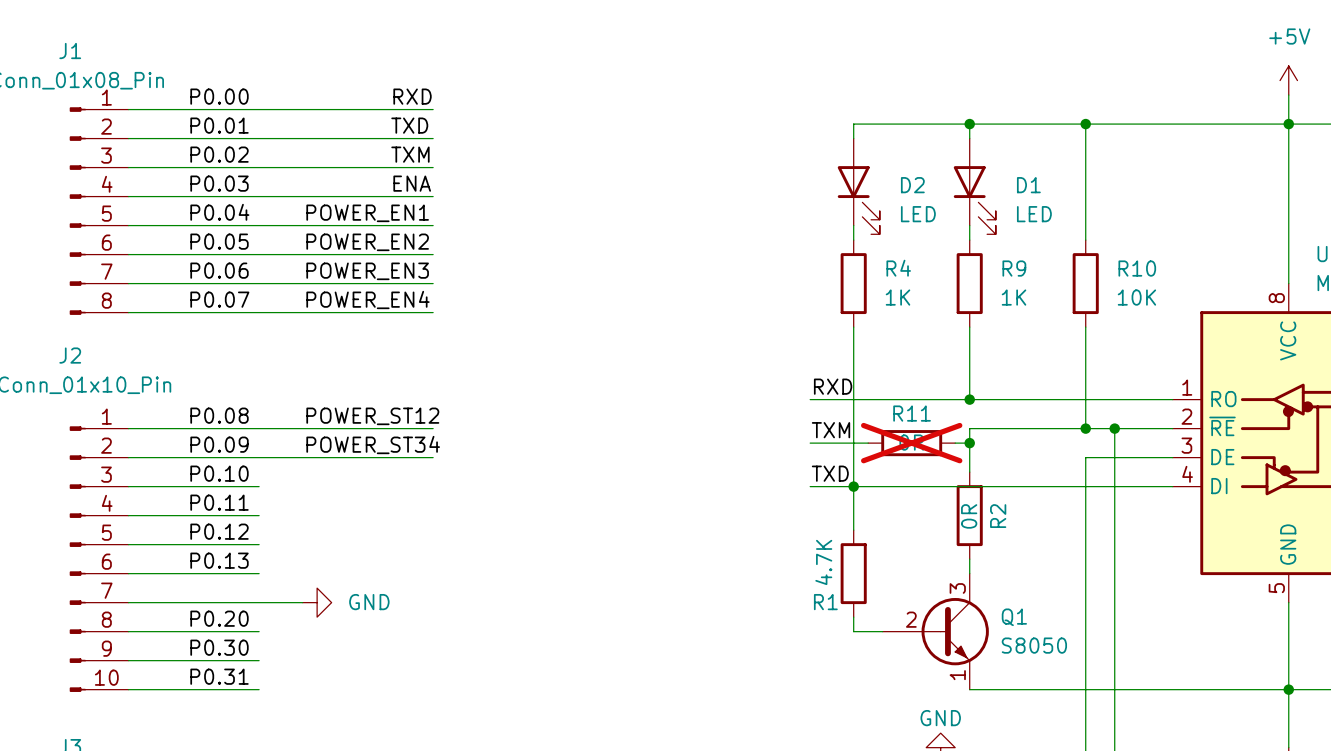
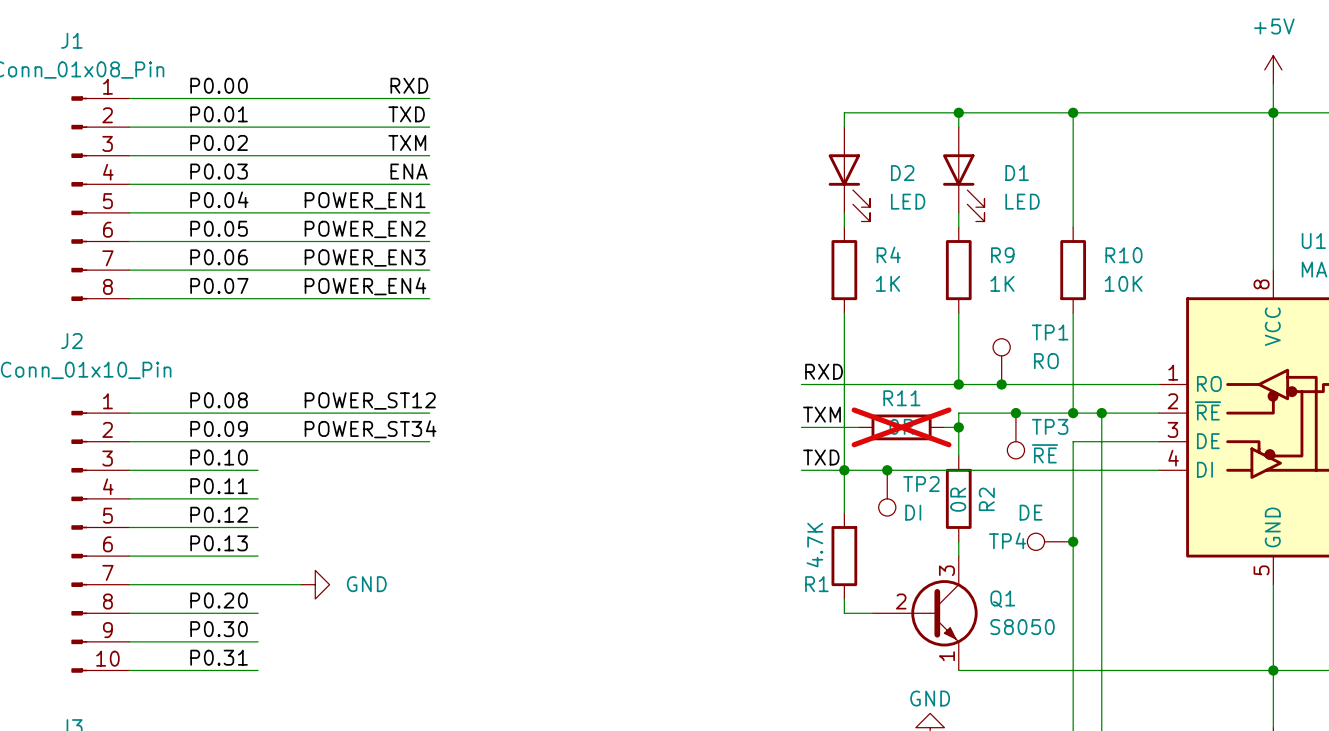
TP1: none -> RO (1001, 361)
junction: none -> (1001, 384)
junction: none -> (1015, 413)
TP3: none -> ~{RE} (1015, 435)
junction: none -> (887, 470)
TP2: none -> DI (887, 493)
TP4: none -> DE (1050, 541)
junction: none -> (1073, 541)

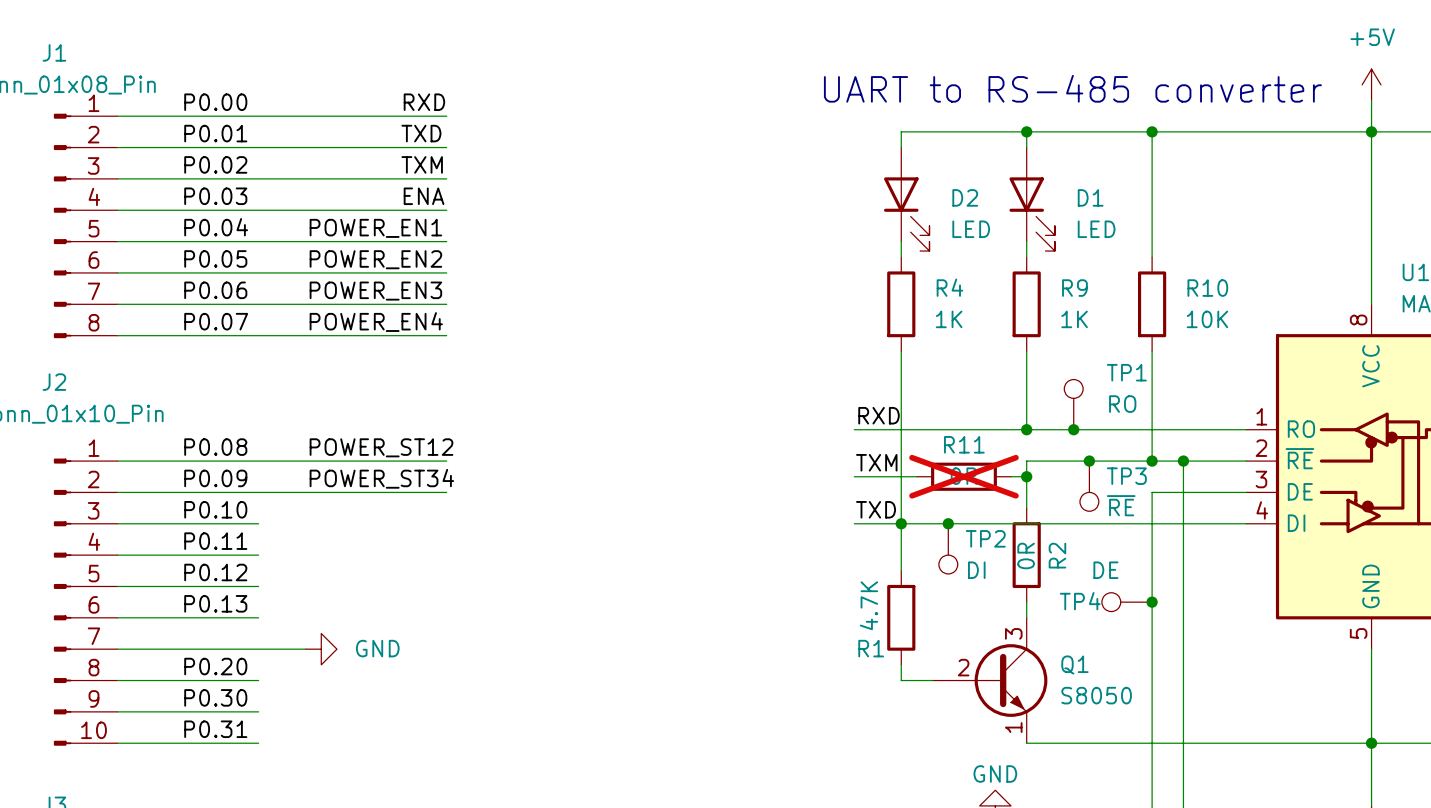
text: none -> UART to RS-485 converter (1072, 88)

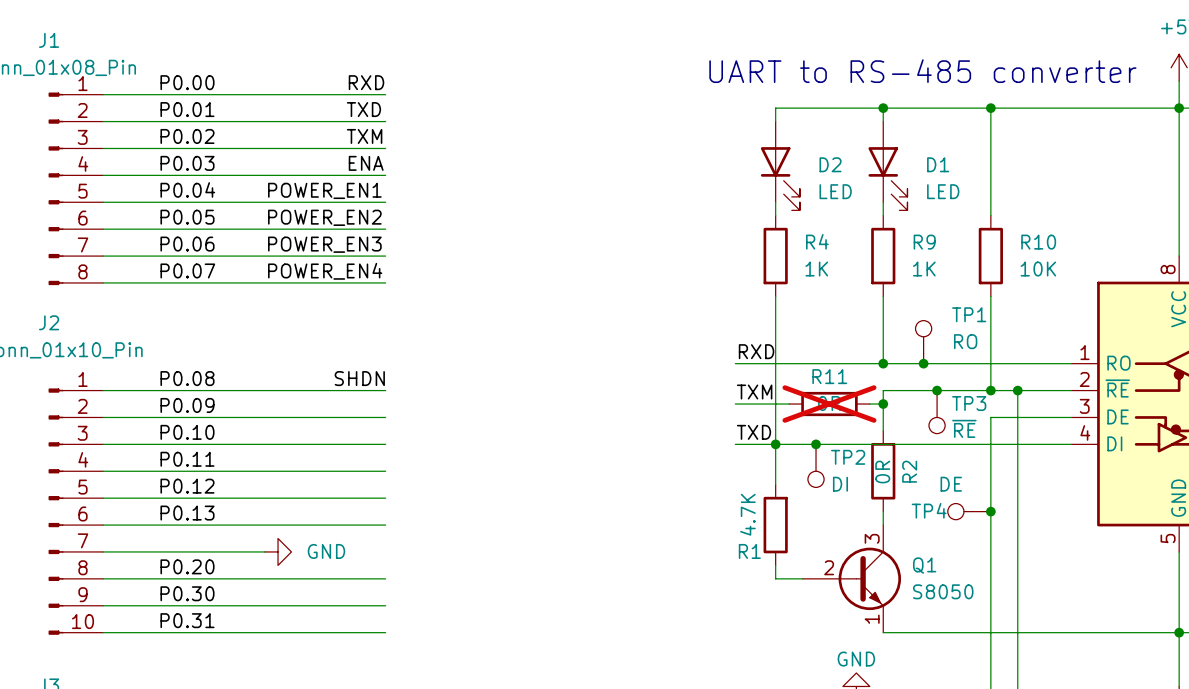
label: POWER_ST12 (381, 447) -> none
label: none -> SHDN (359, 378)
label: POWER_ST34 (381, 478) -> none
wire: none -> (224, 444) (385, 444)
wire: none -> (224, 471) (385, 471)
wire: none -> (224, 498) (385, 498)
wire: none -> (224, 525) (385, 525)
wire: none -> (224, 578) (385, 578)
wire: none -> (224, 605) (385, 605)
wire: none -> (224, 632) (385, 632)

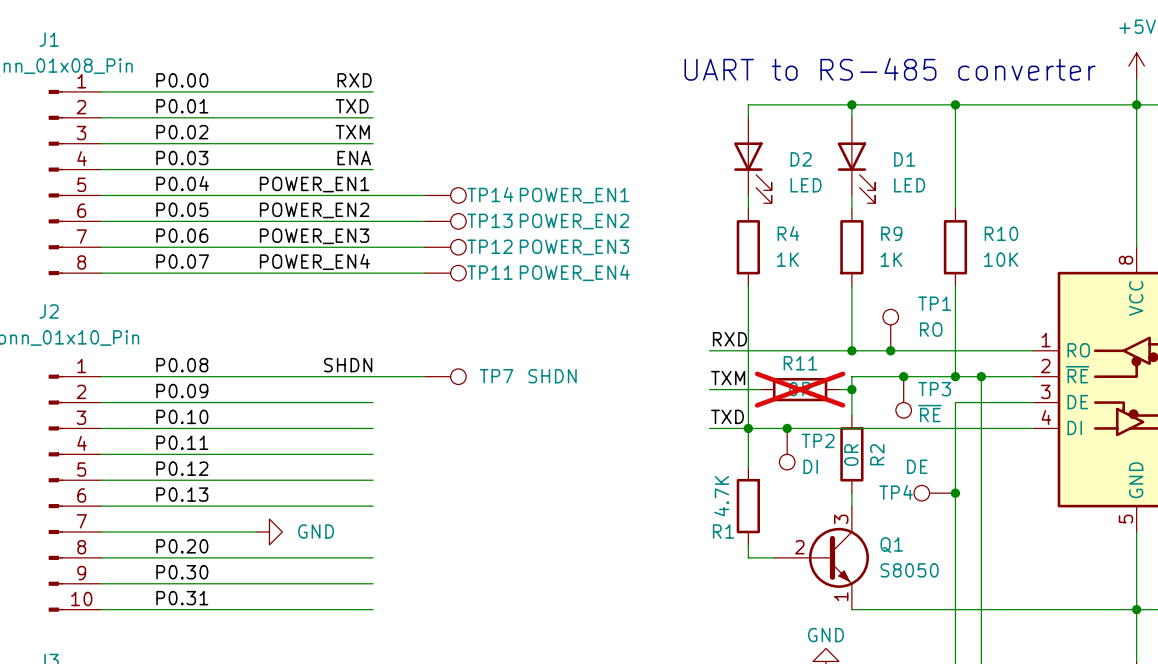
wire: none -> (372, 195) (424, 195)
TP14: none -> POWER_EN1 (445, 195)
wire: none -> (372, 221) (424, 221)
TP13: none -> POWER_EN2 (445, 221)
wire: none -> (372, 247) (424, 247)
TP12: none -> POWER_EN3 (445, 247)
wire: none -> (372, 273) (424, 273)
TP11: none -> POWER_EN4 (445, 273)
wire: none -> (372, 376) (424, 376)
TP7: none -> SHDN (445, 376)

